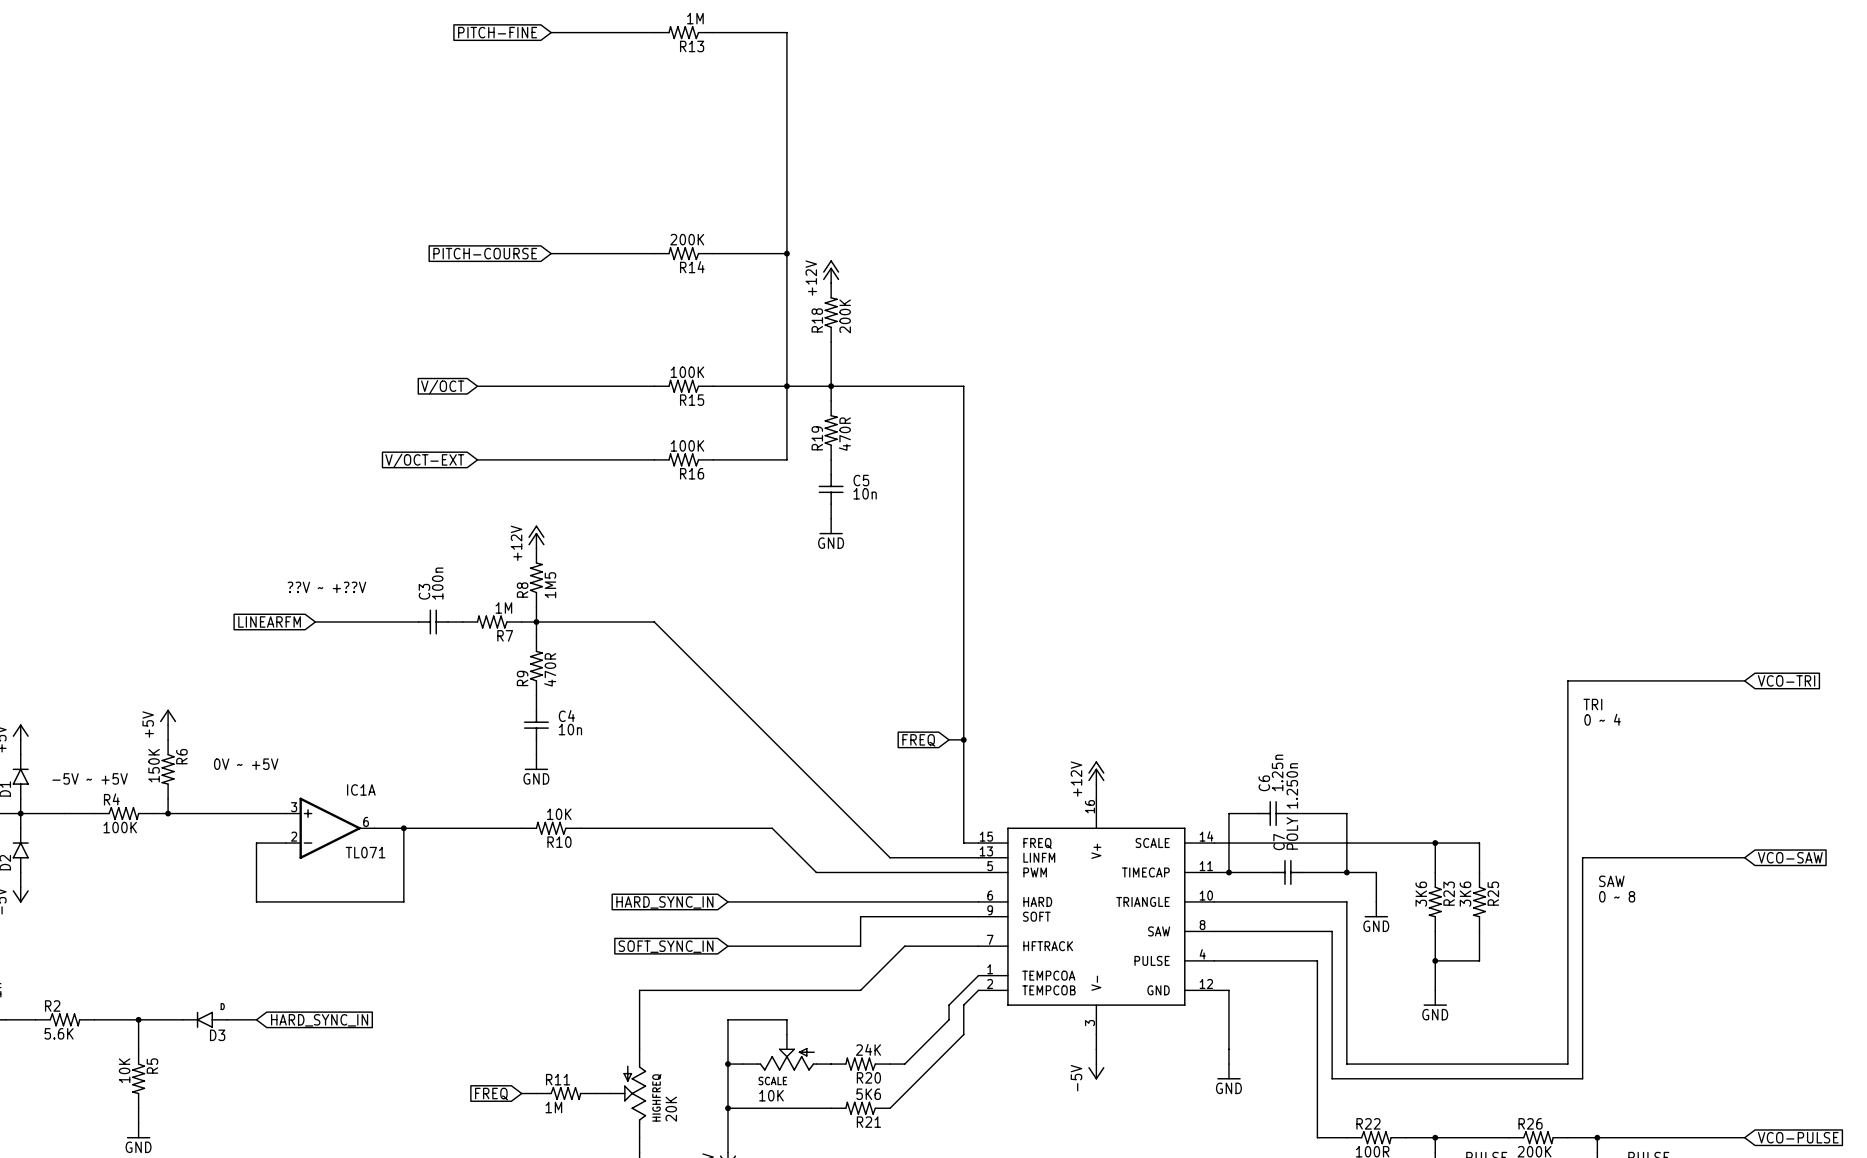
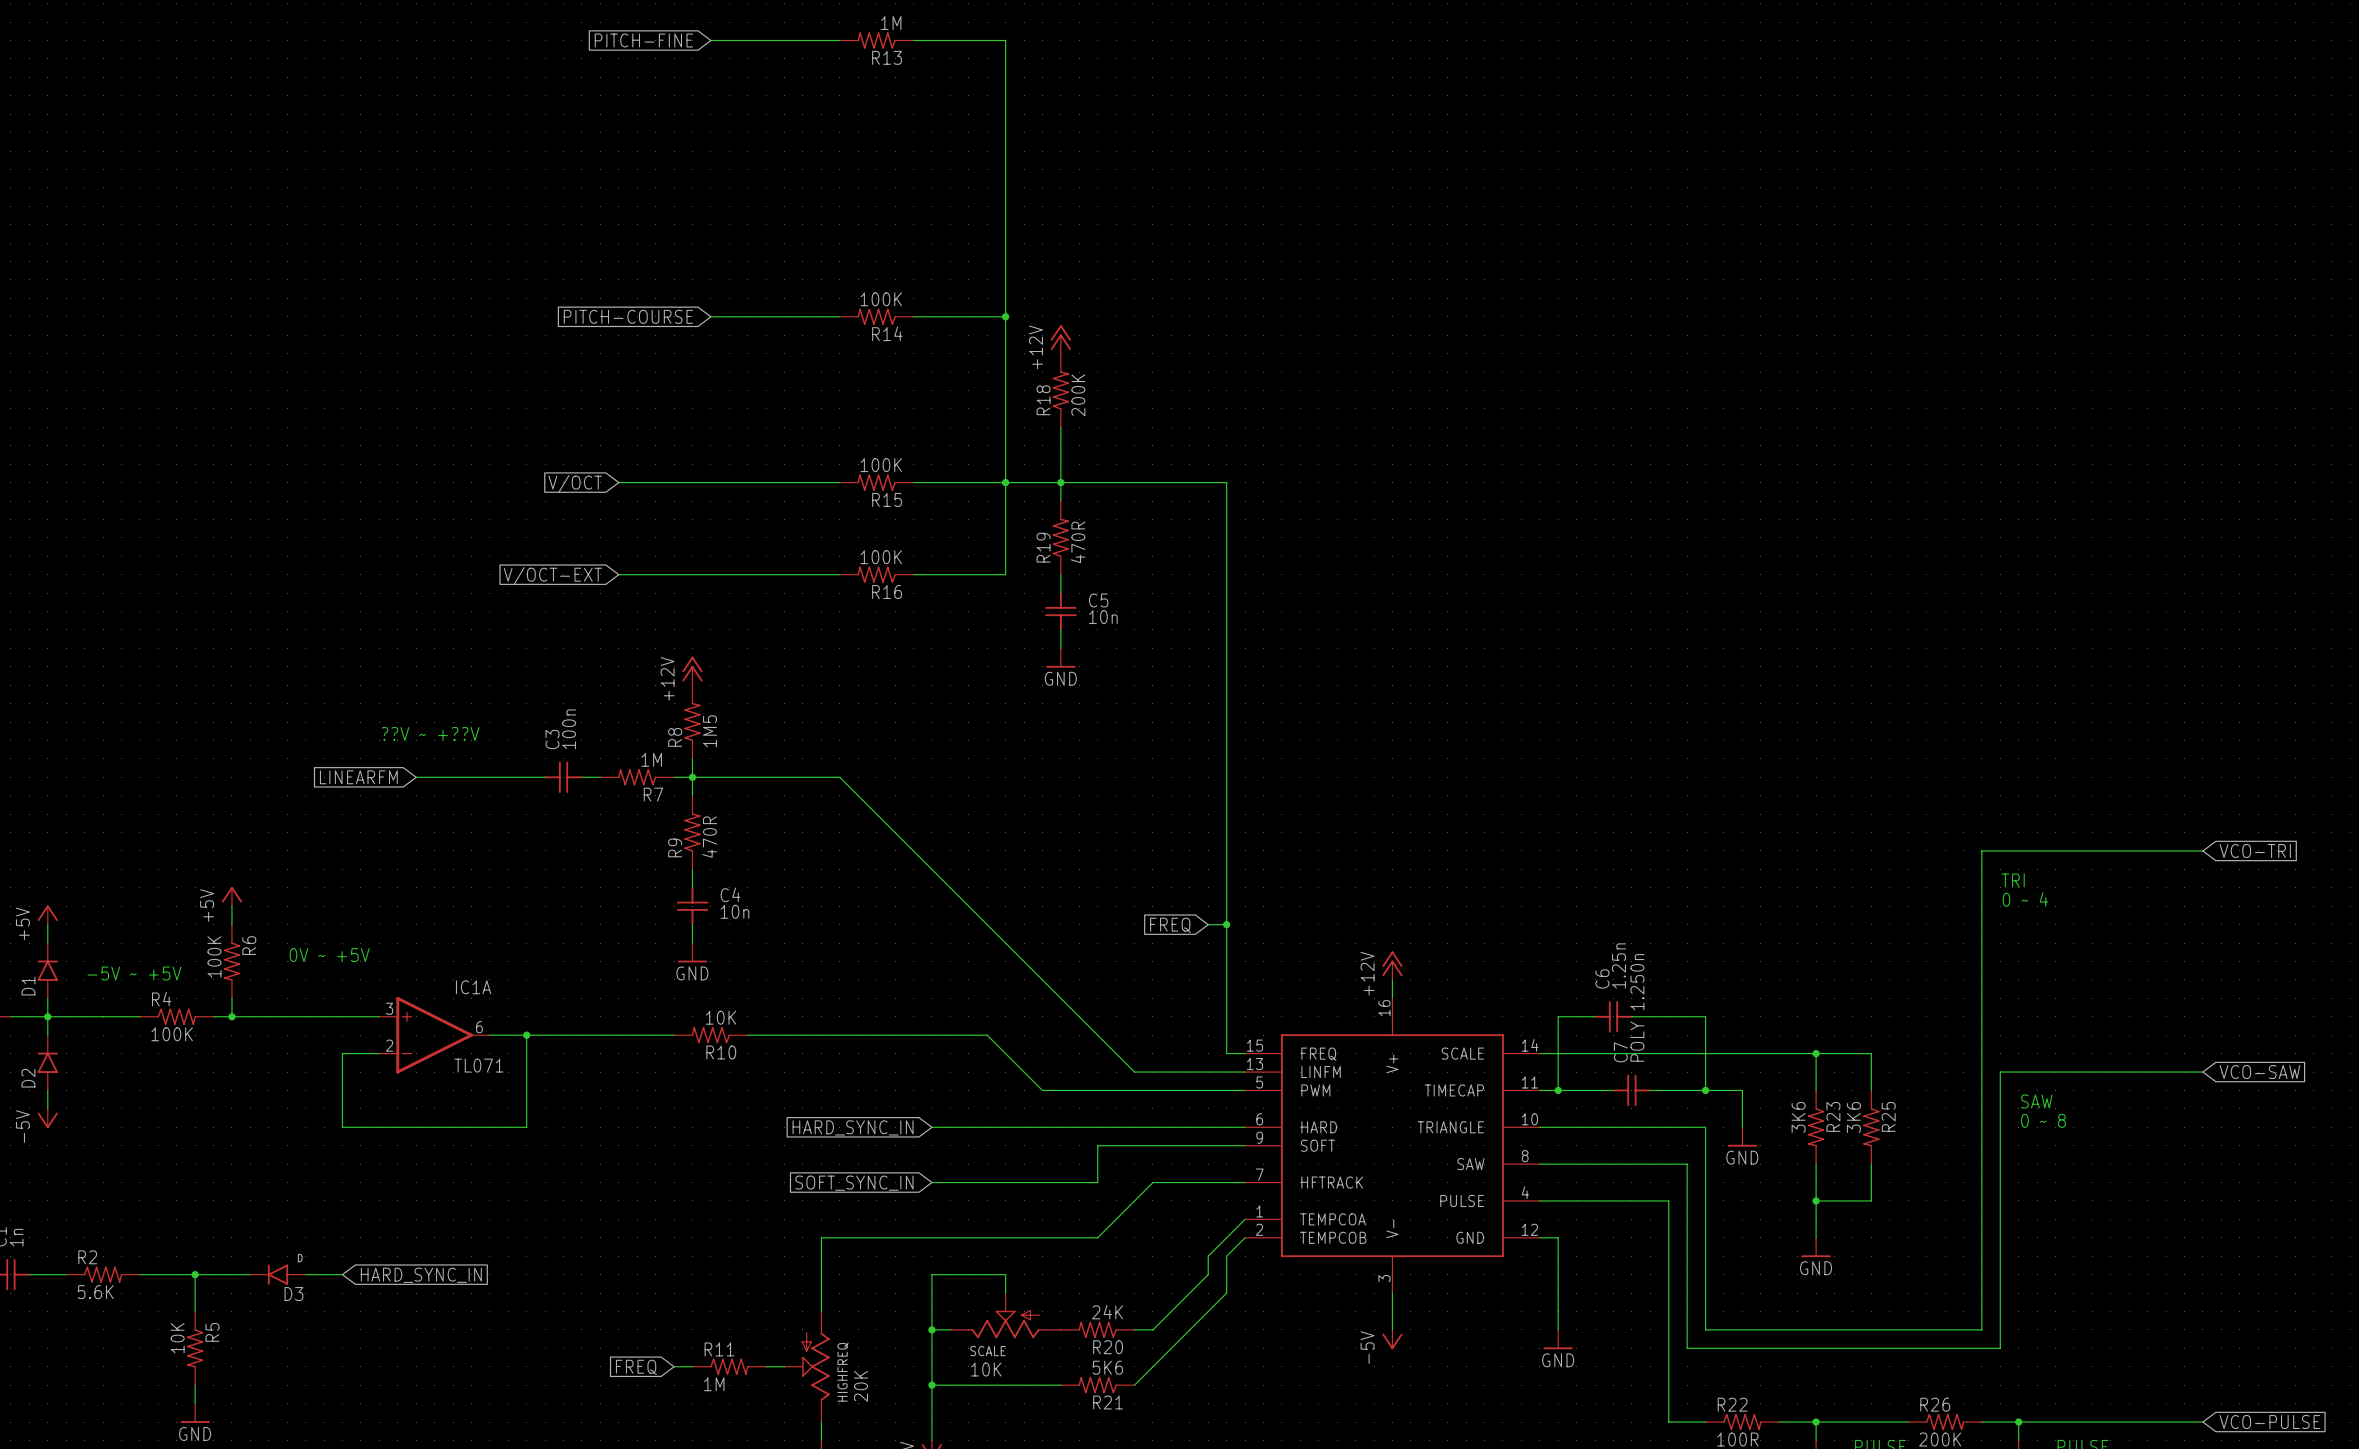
R14 value: 200K (687, 239) -> 100K (881, 299)
R6 value: 150K (154, 765) -> 100K (214, 956)

